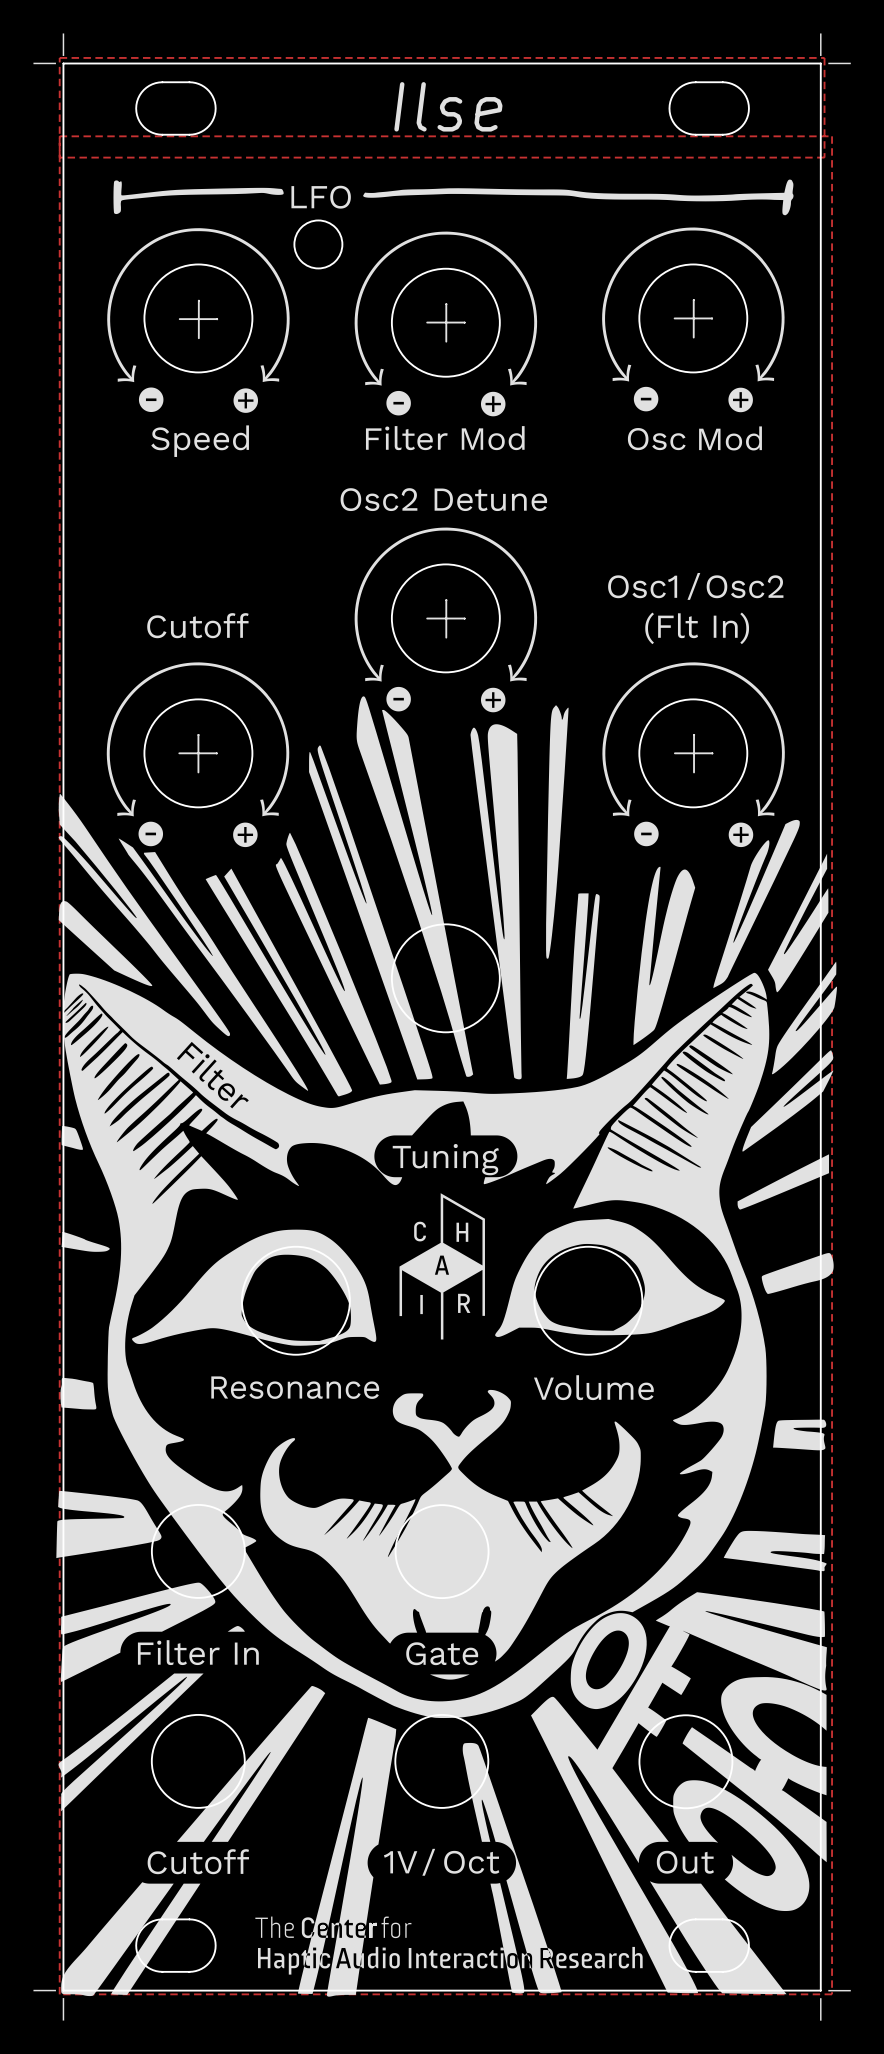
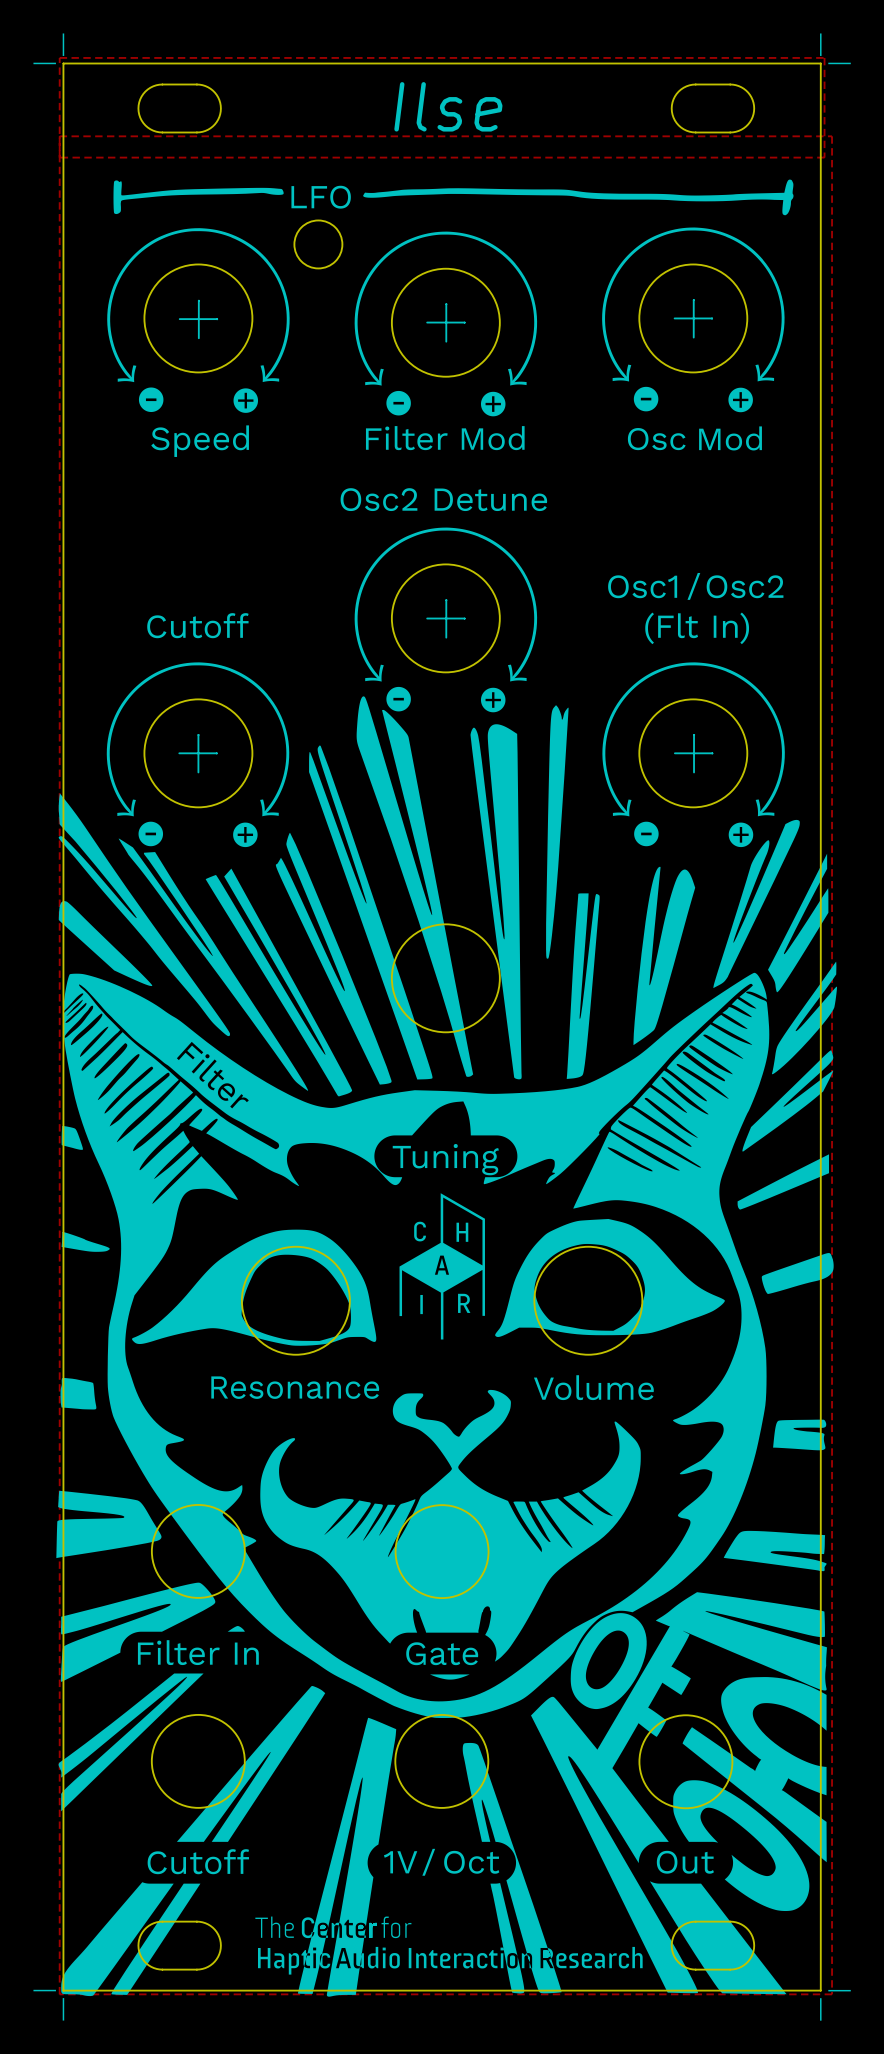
drawing shape: [135, 81, 217, 1973] -> [137, 83, 222, 1971]
drawing shape: [668, 81, 750, 1973] -> [670, 83, 755, 1971]

